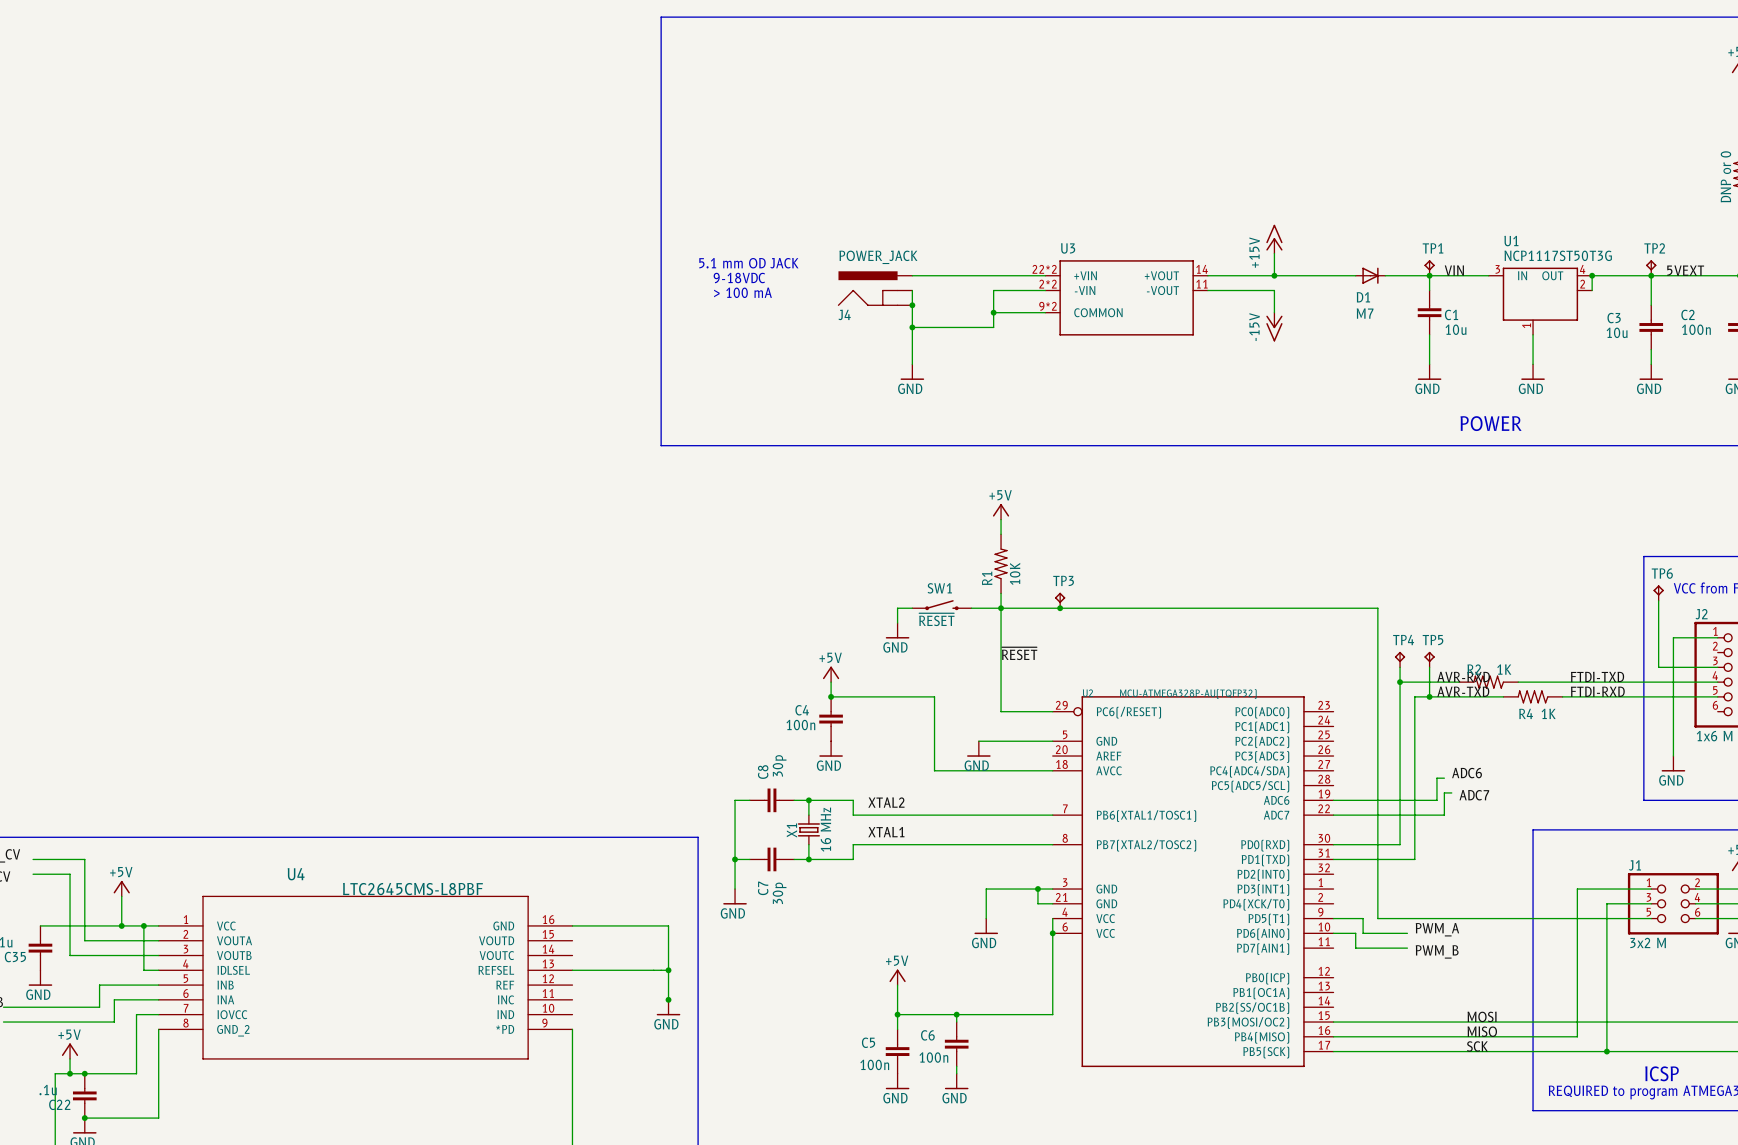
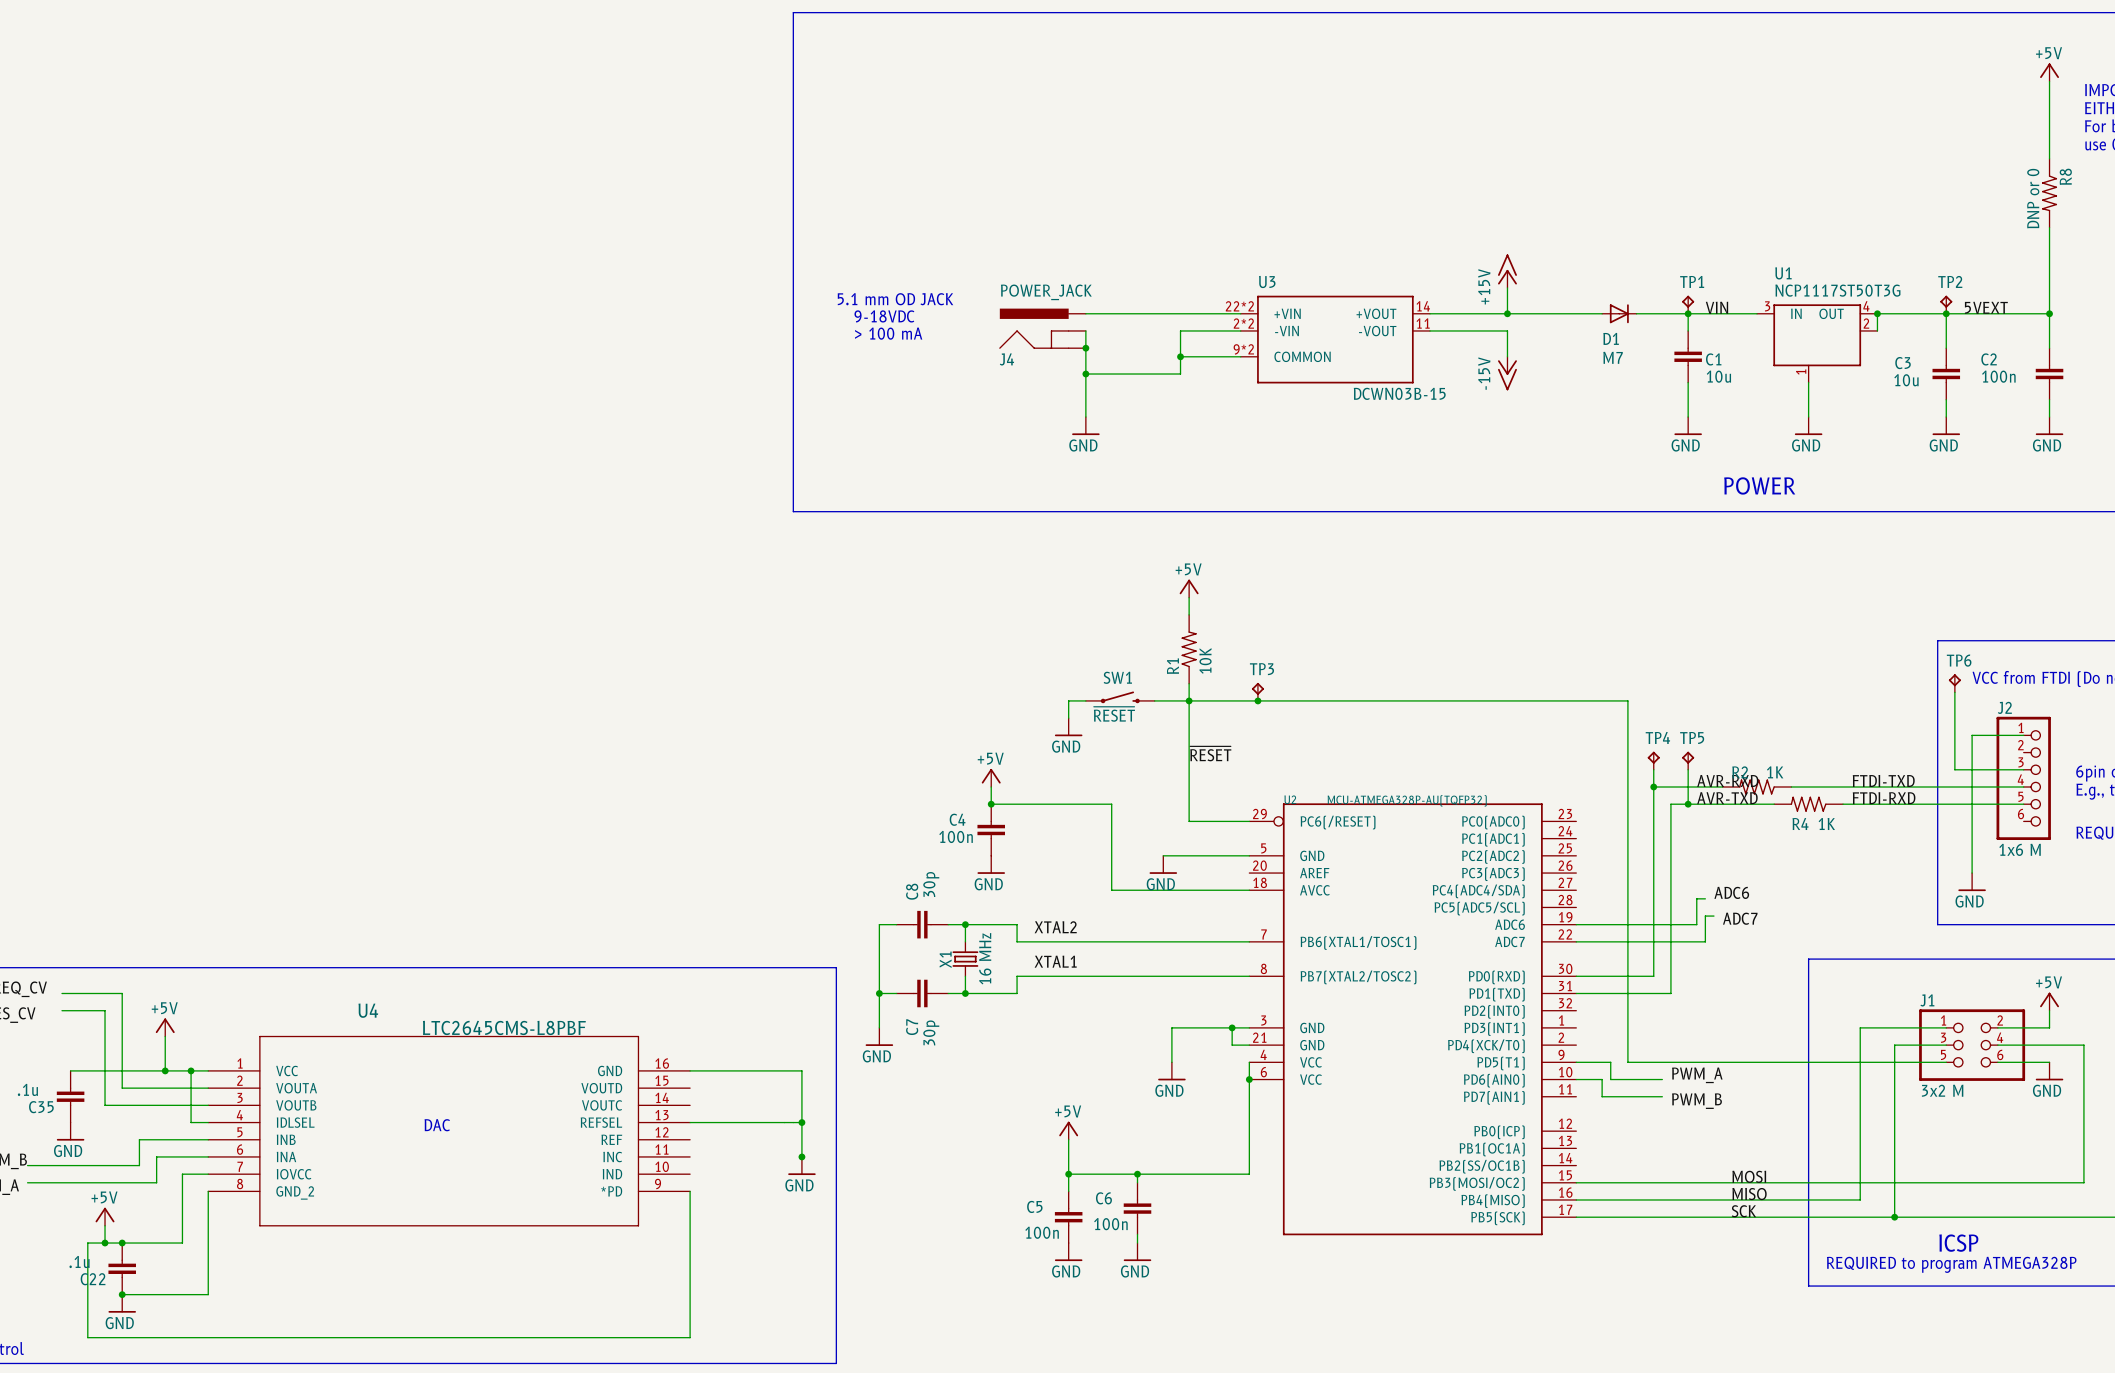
U3 value: none -> DCWN03B-15 (1399, 393)
text: none -> DAC (437, 1125)

